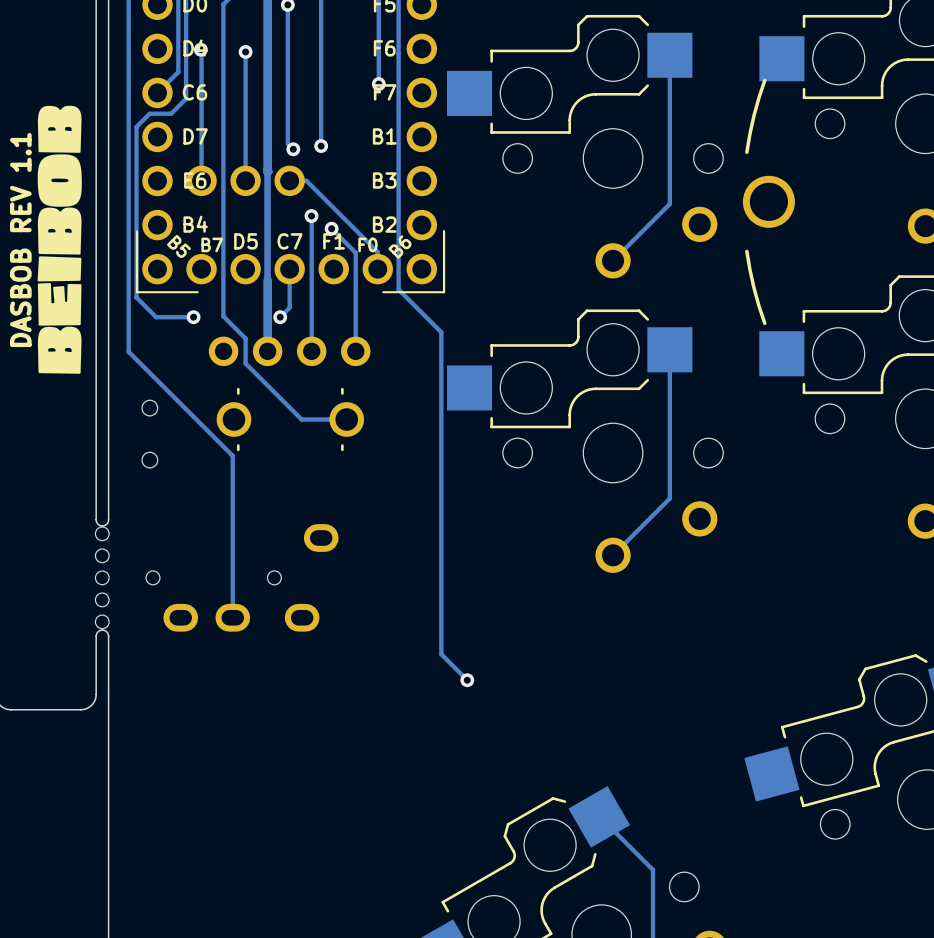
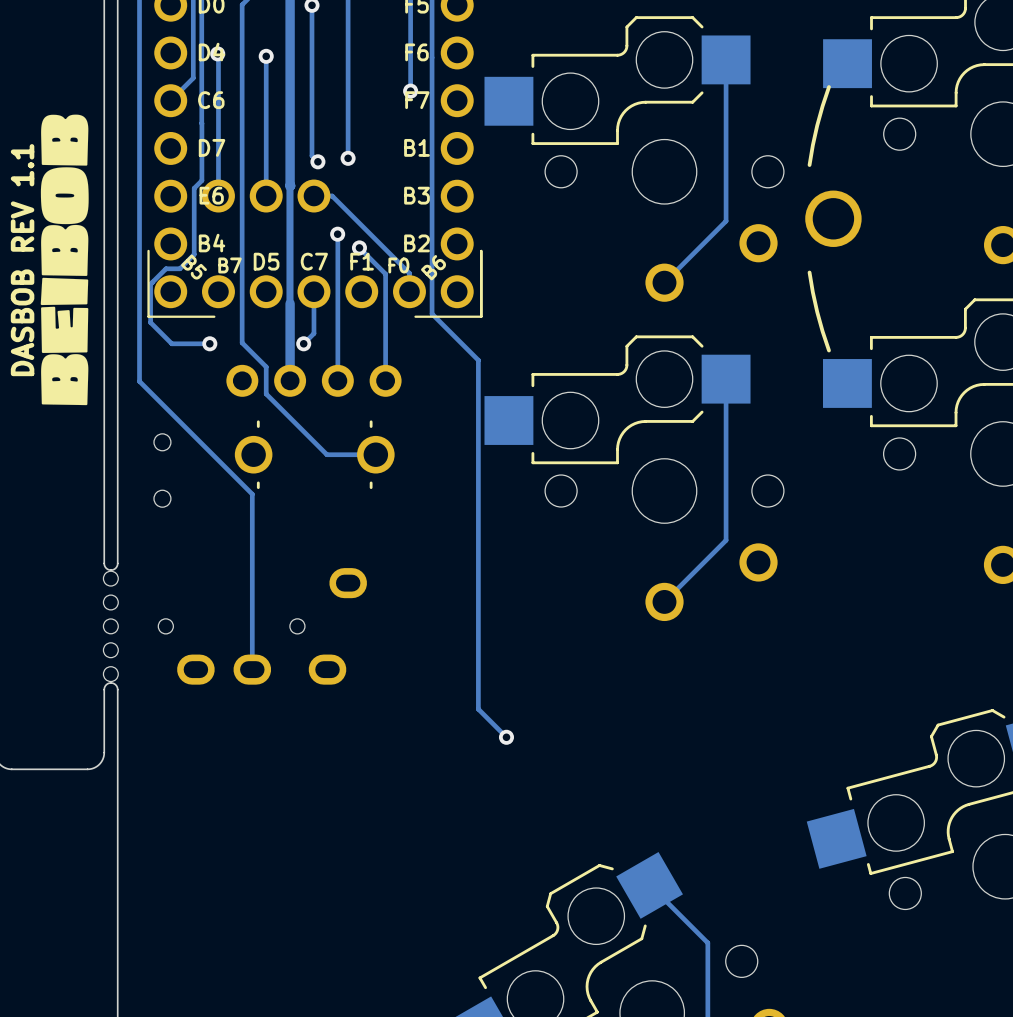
track: (186, 98) (171, 113) (149, 113) (136, 126) (136, 297) (156, 317) (158, 317) -> (201, 123) (201, 180) (194, 188) (194, 254) (179, 268) (166, 268) (150, 284) (150, 322) (171, 343)
track: none -> (201, 107) (201, 123)

